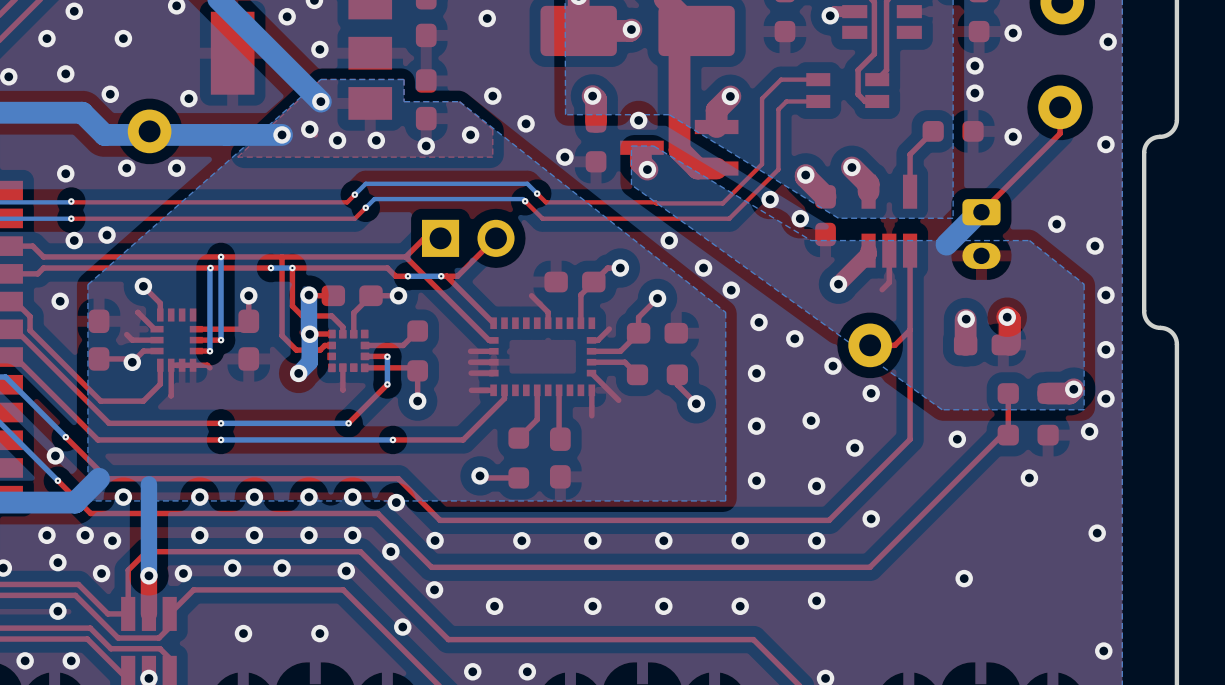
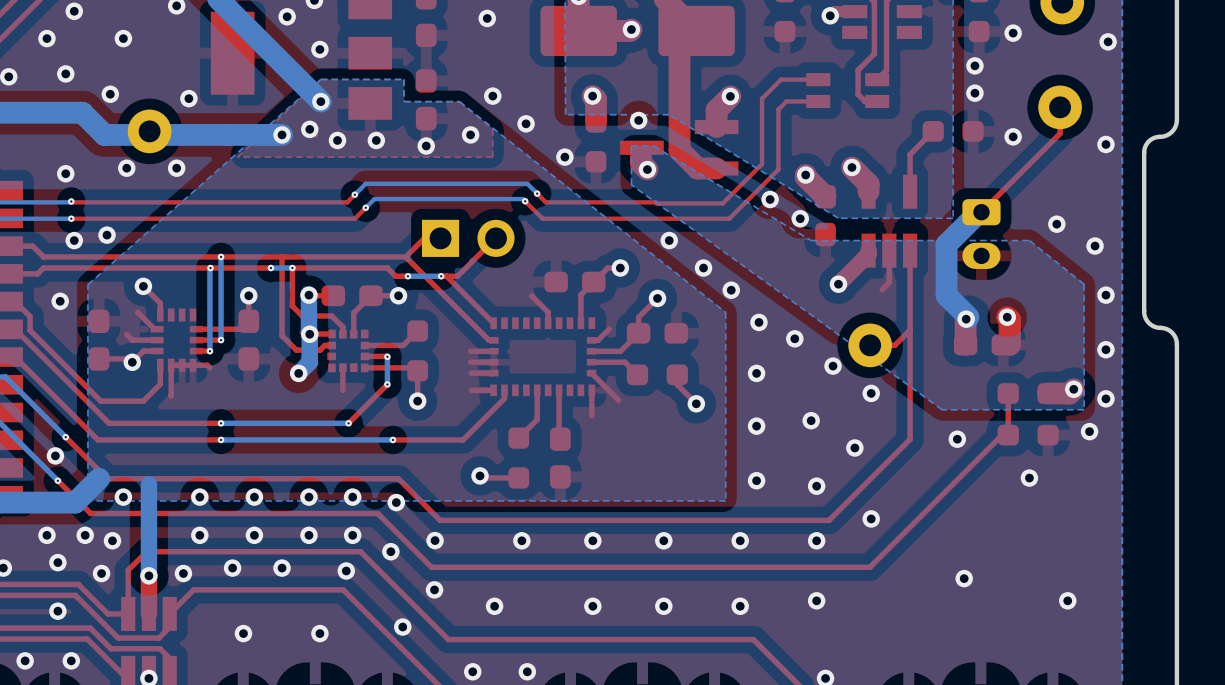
bottom track: none -> (946, 244) (946, 295) (968, 317)
via: (1097, 533) -> none
via: none -> (1067, 600)
via: (1103, 651) -> none

